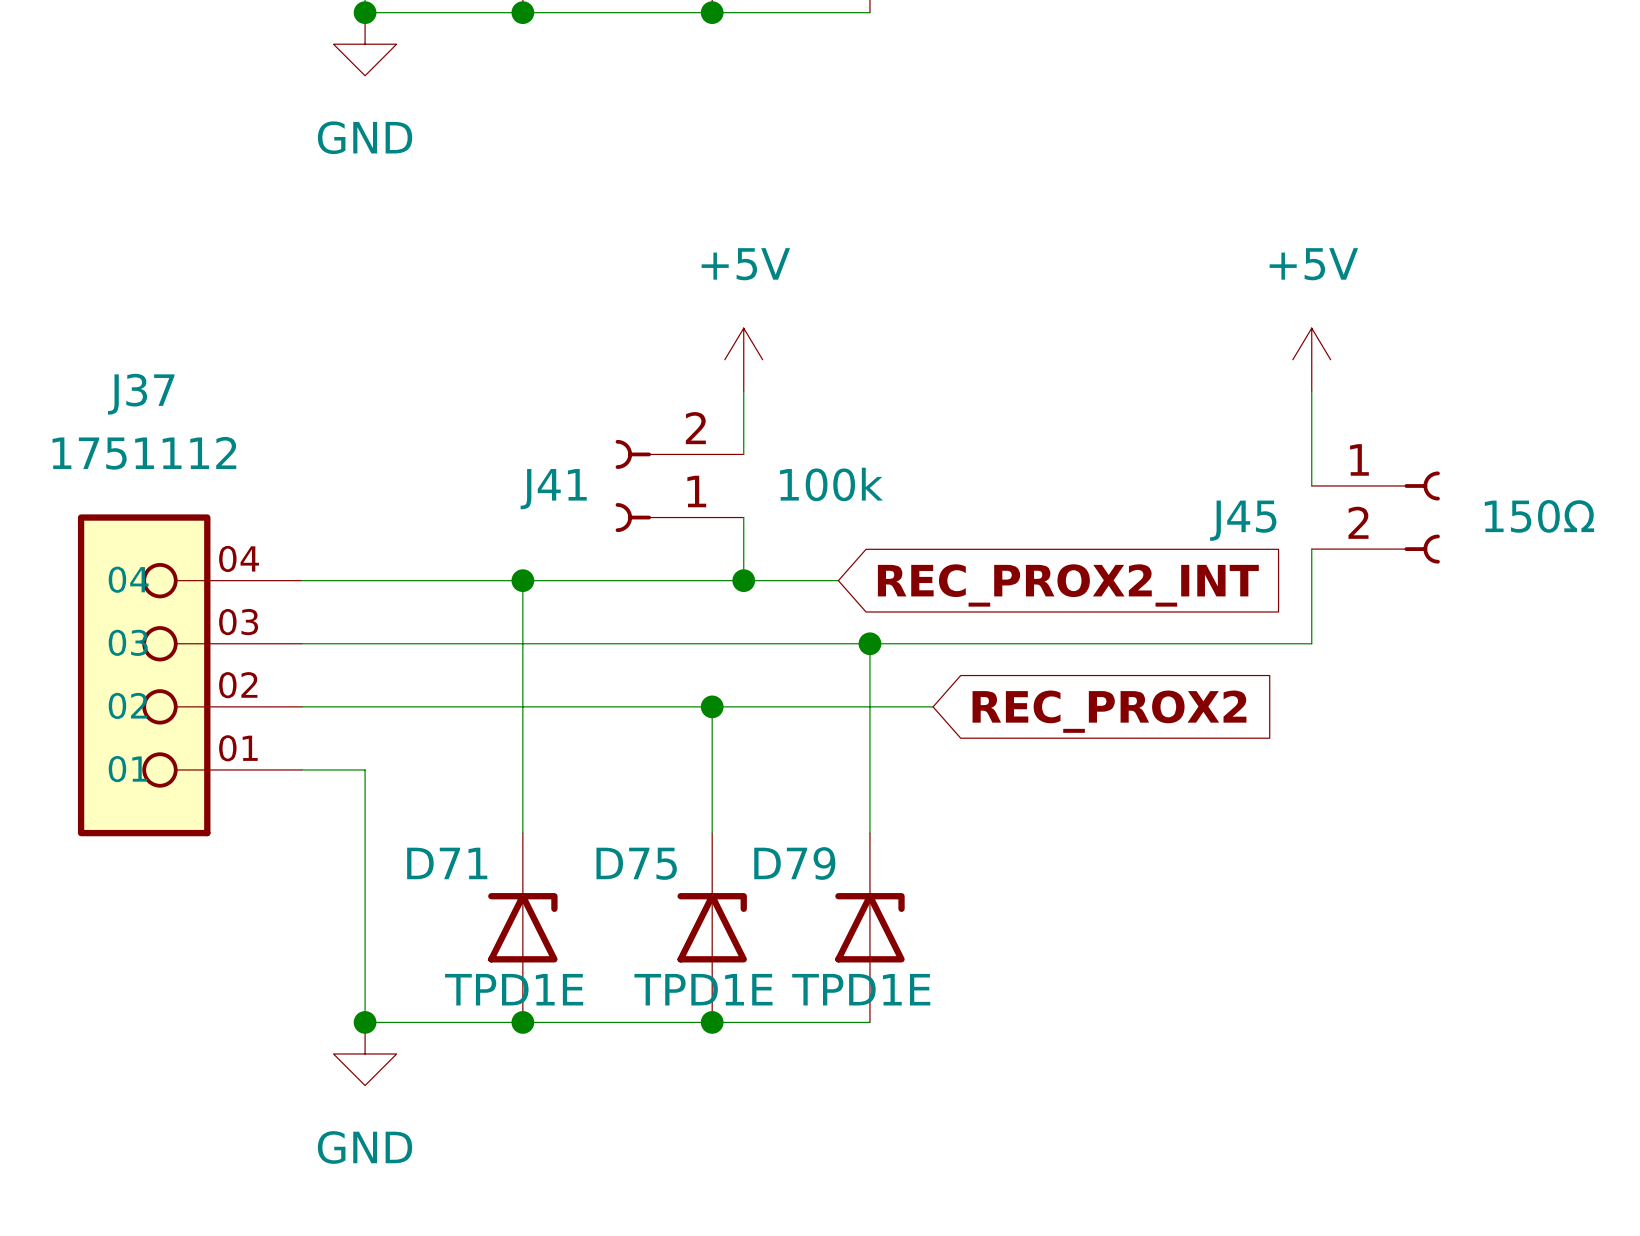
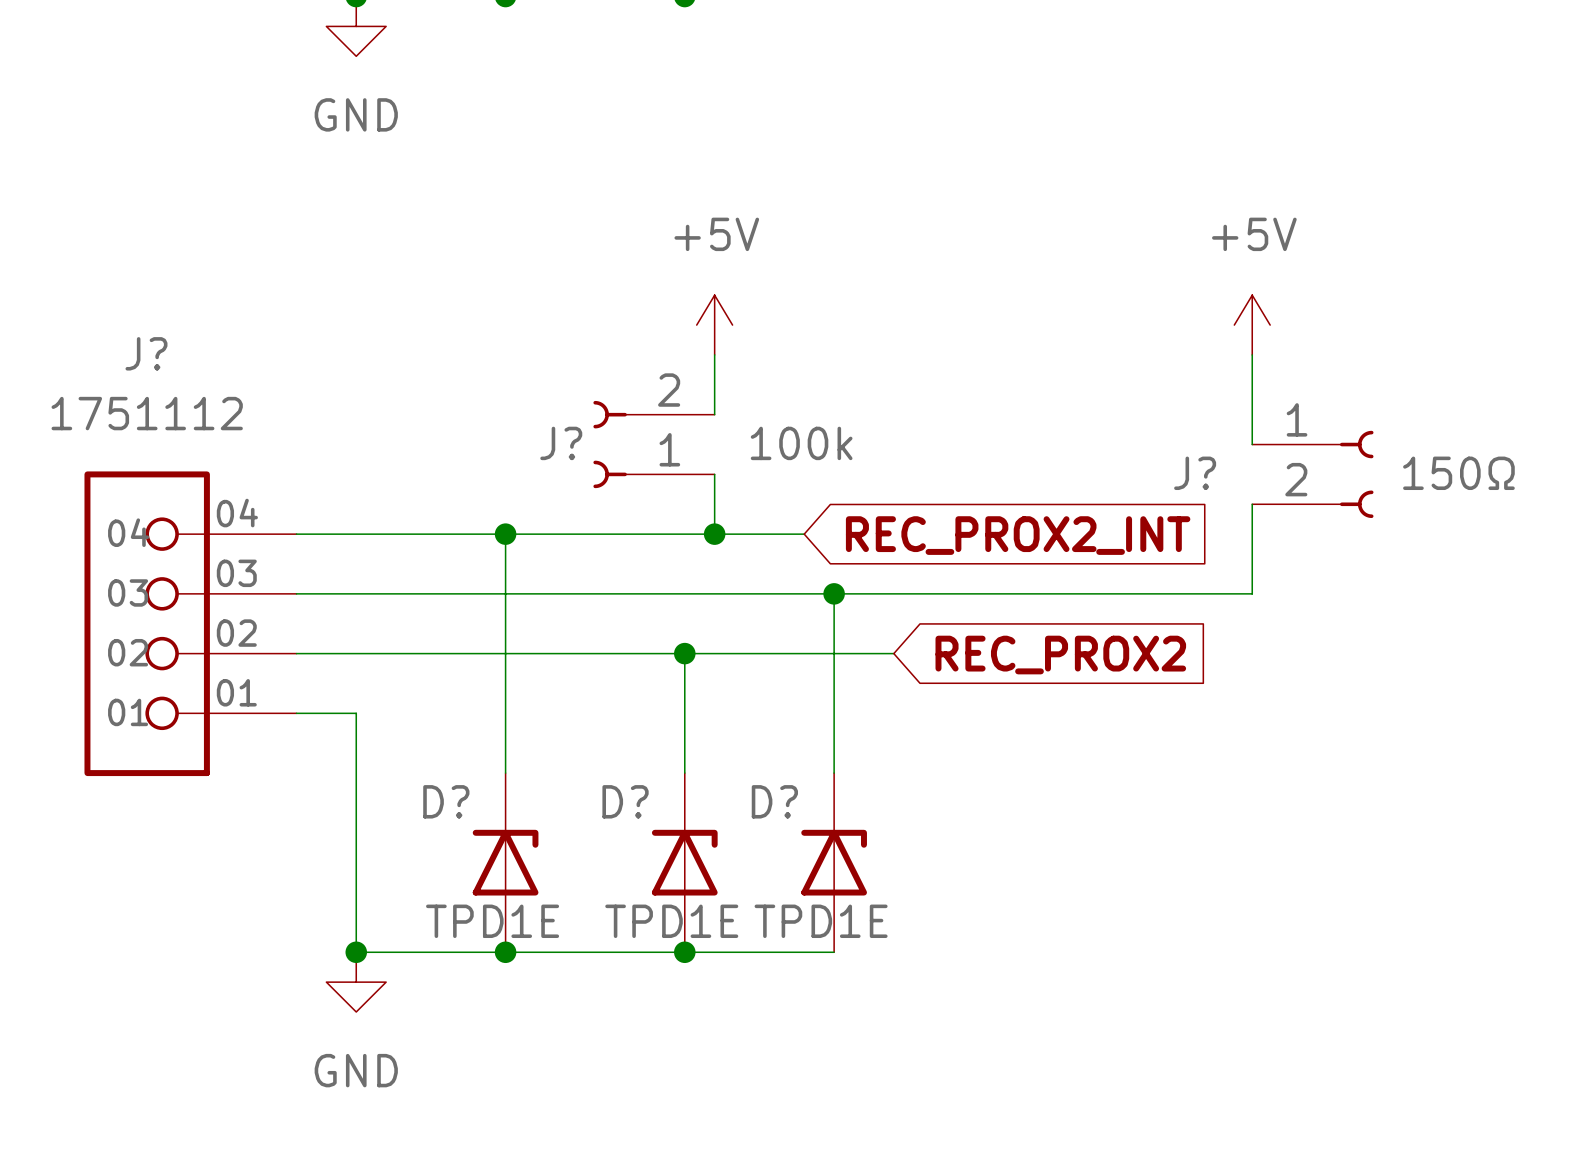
J37 name: J37 (141, 394) -> J? (146, 353)
J41 name: J41 (553, 489) -> J? (561, 443)
J45 name: J45 (1243, 520) -> J? (1195, 473)
D71 name: D71 (447, 863) -> D? (446, 801)
D75 name: D75 (636, 863) -> D? (625, 801)
D79 name: D79 (794, 863) -> D? (774, 801)

